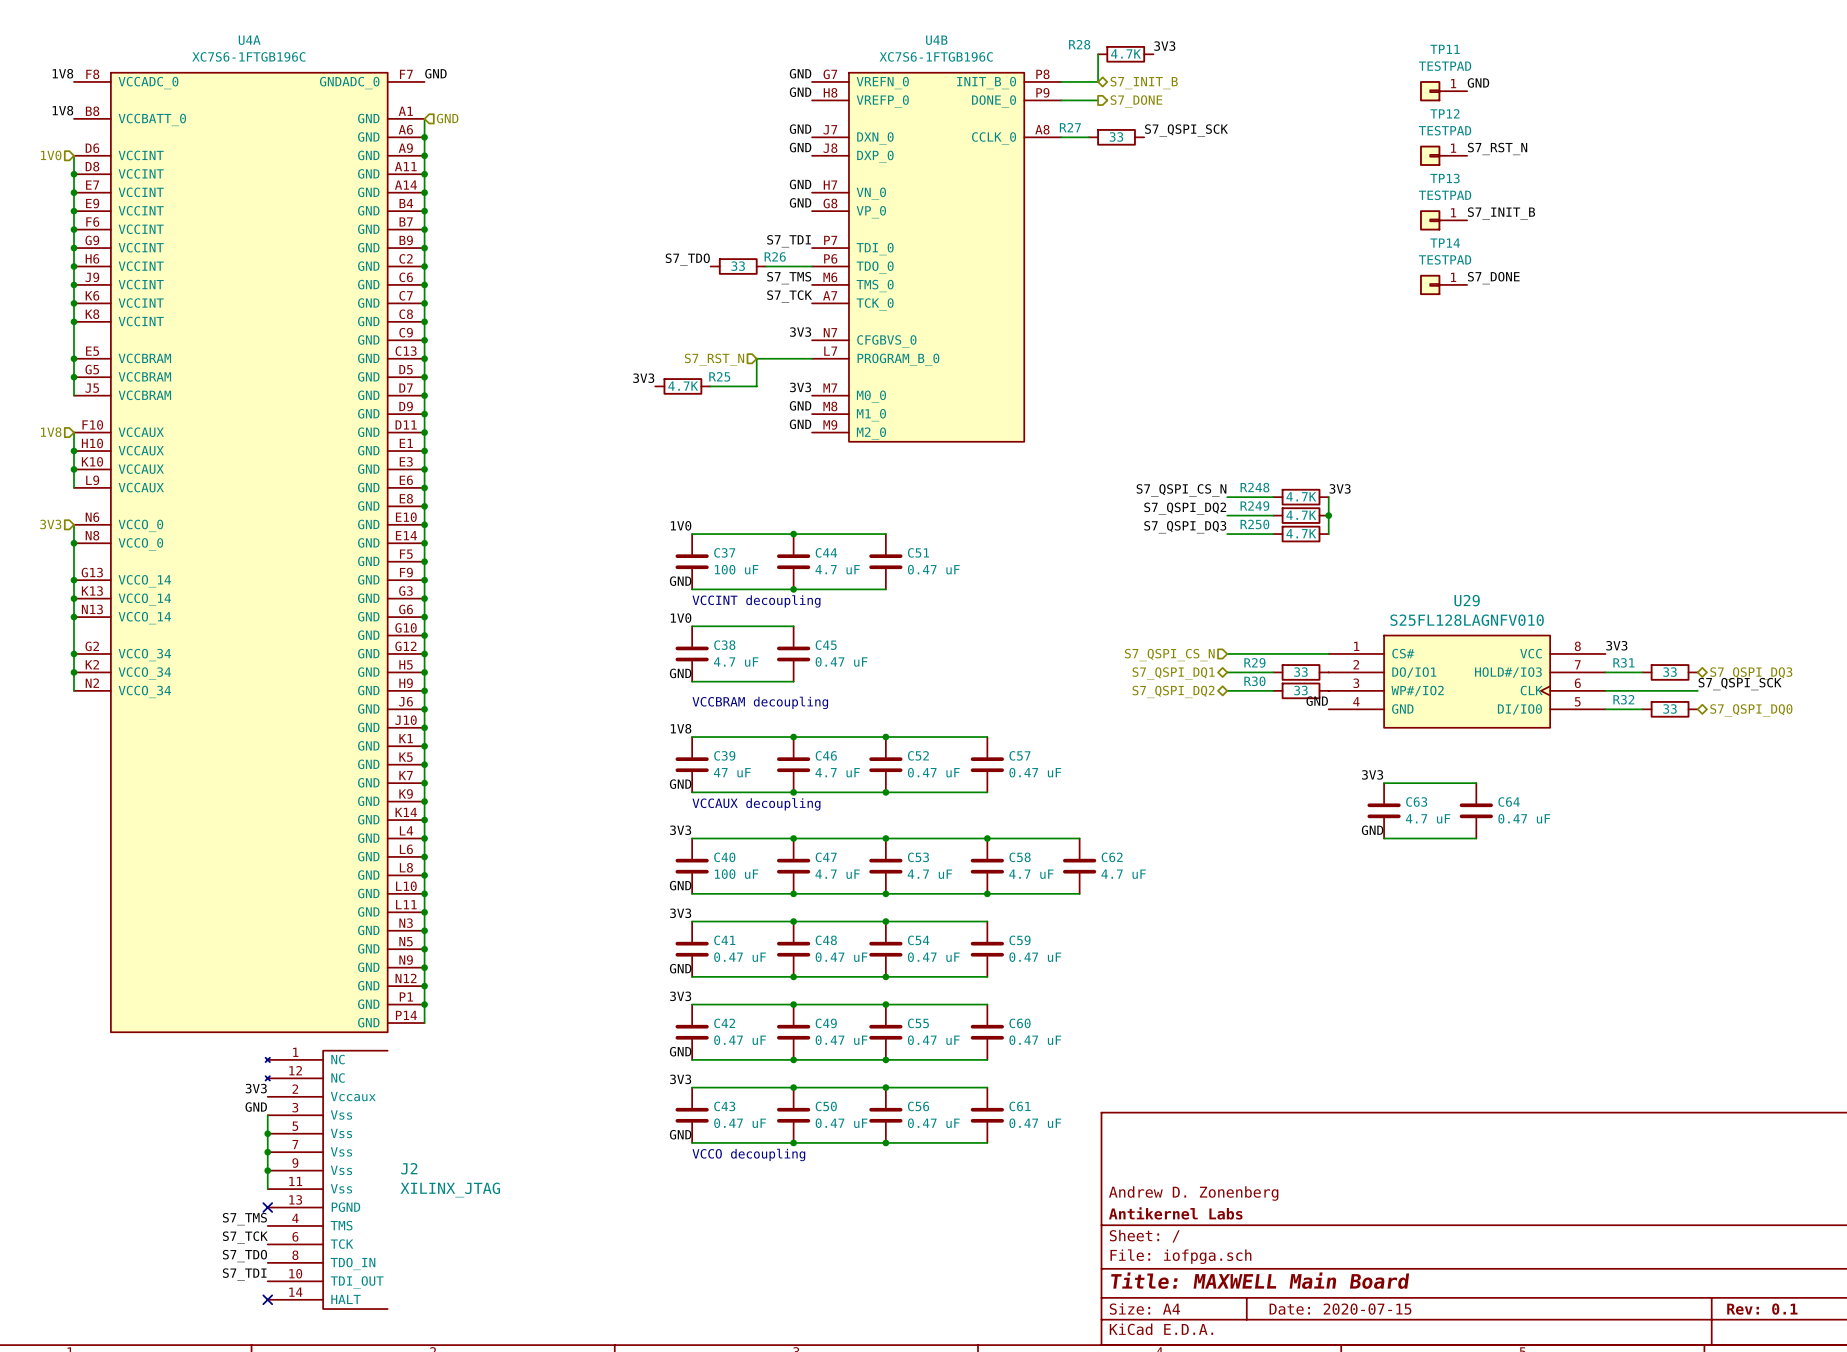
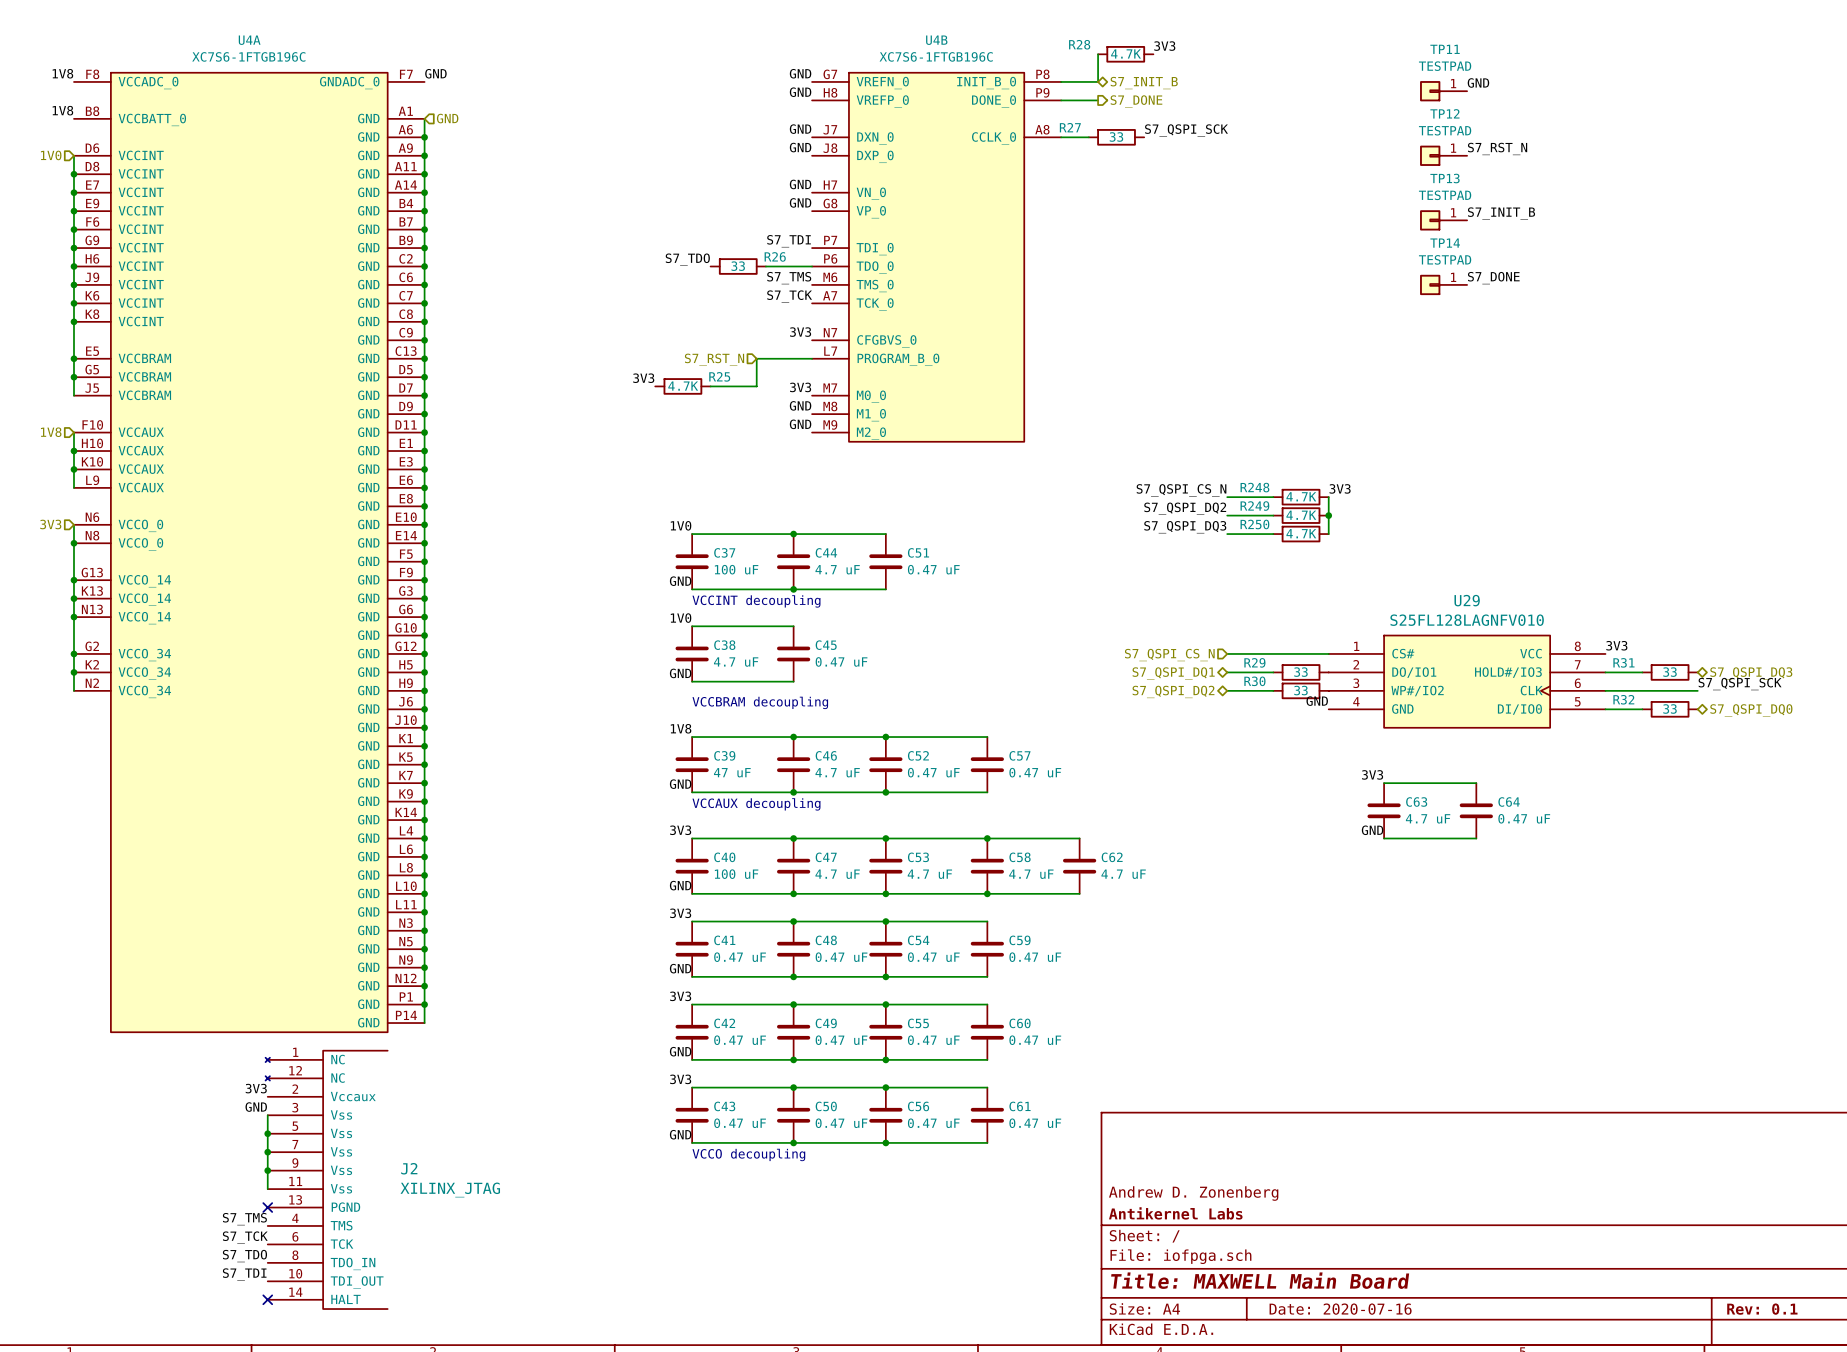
title block: Date: 2020-07-15 (1340, 1309) -> Date: 2020-07-16 (1340, 1309)

